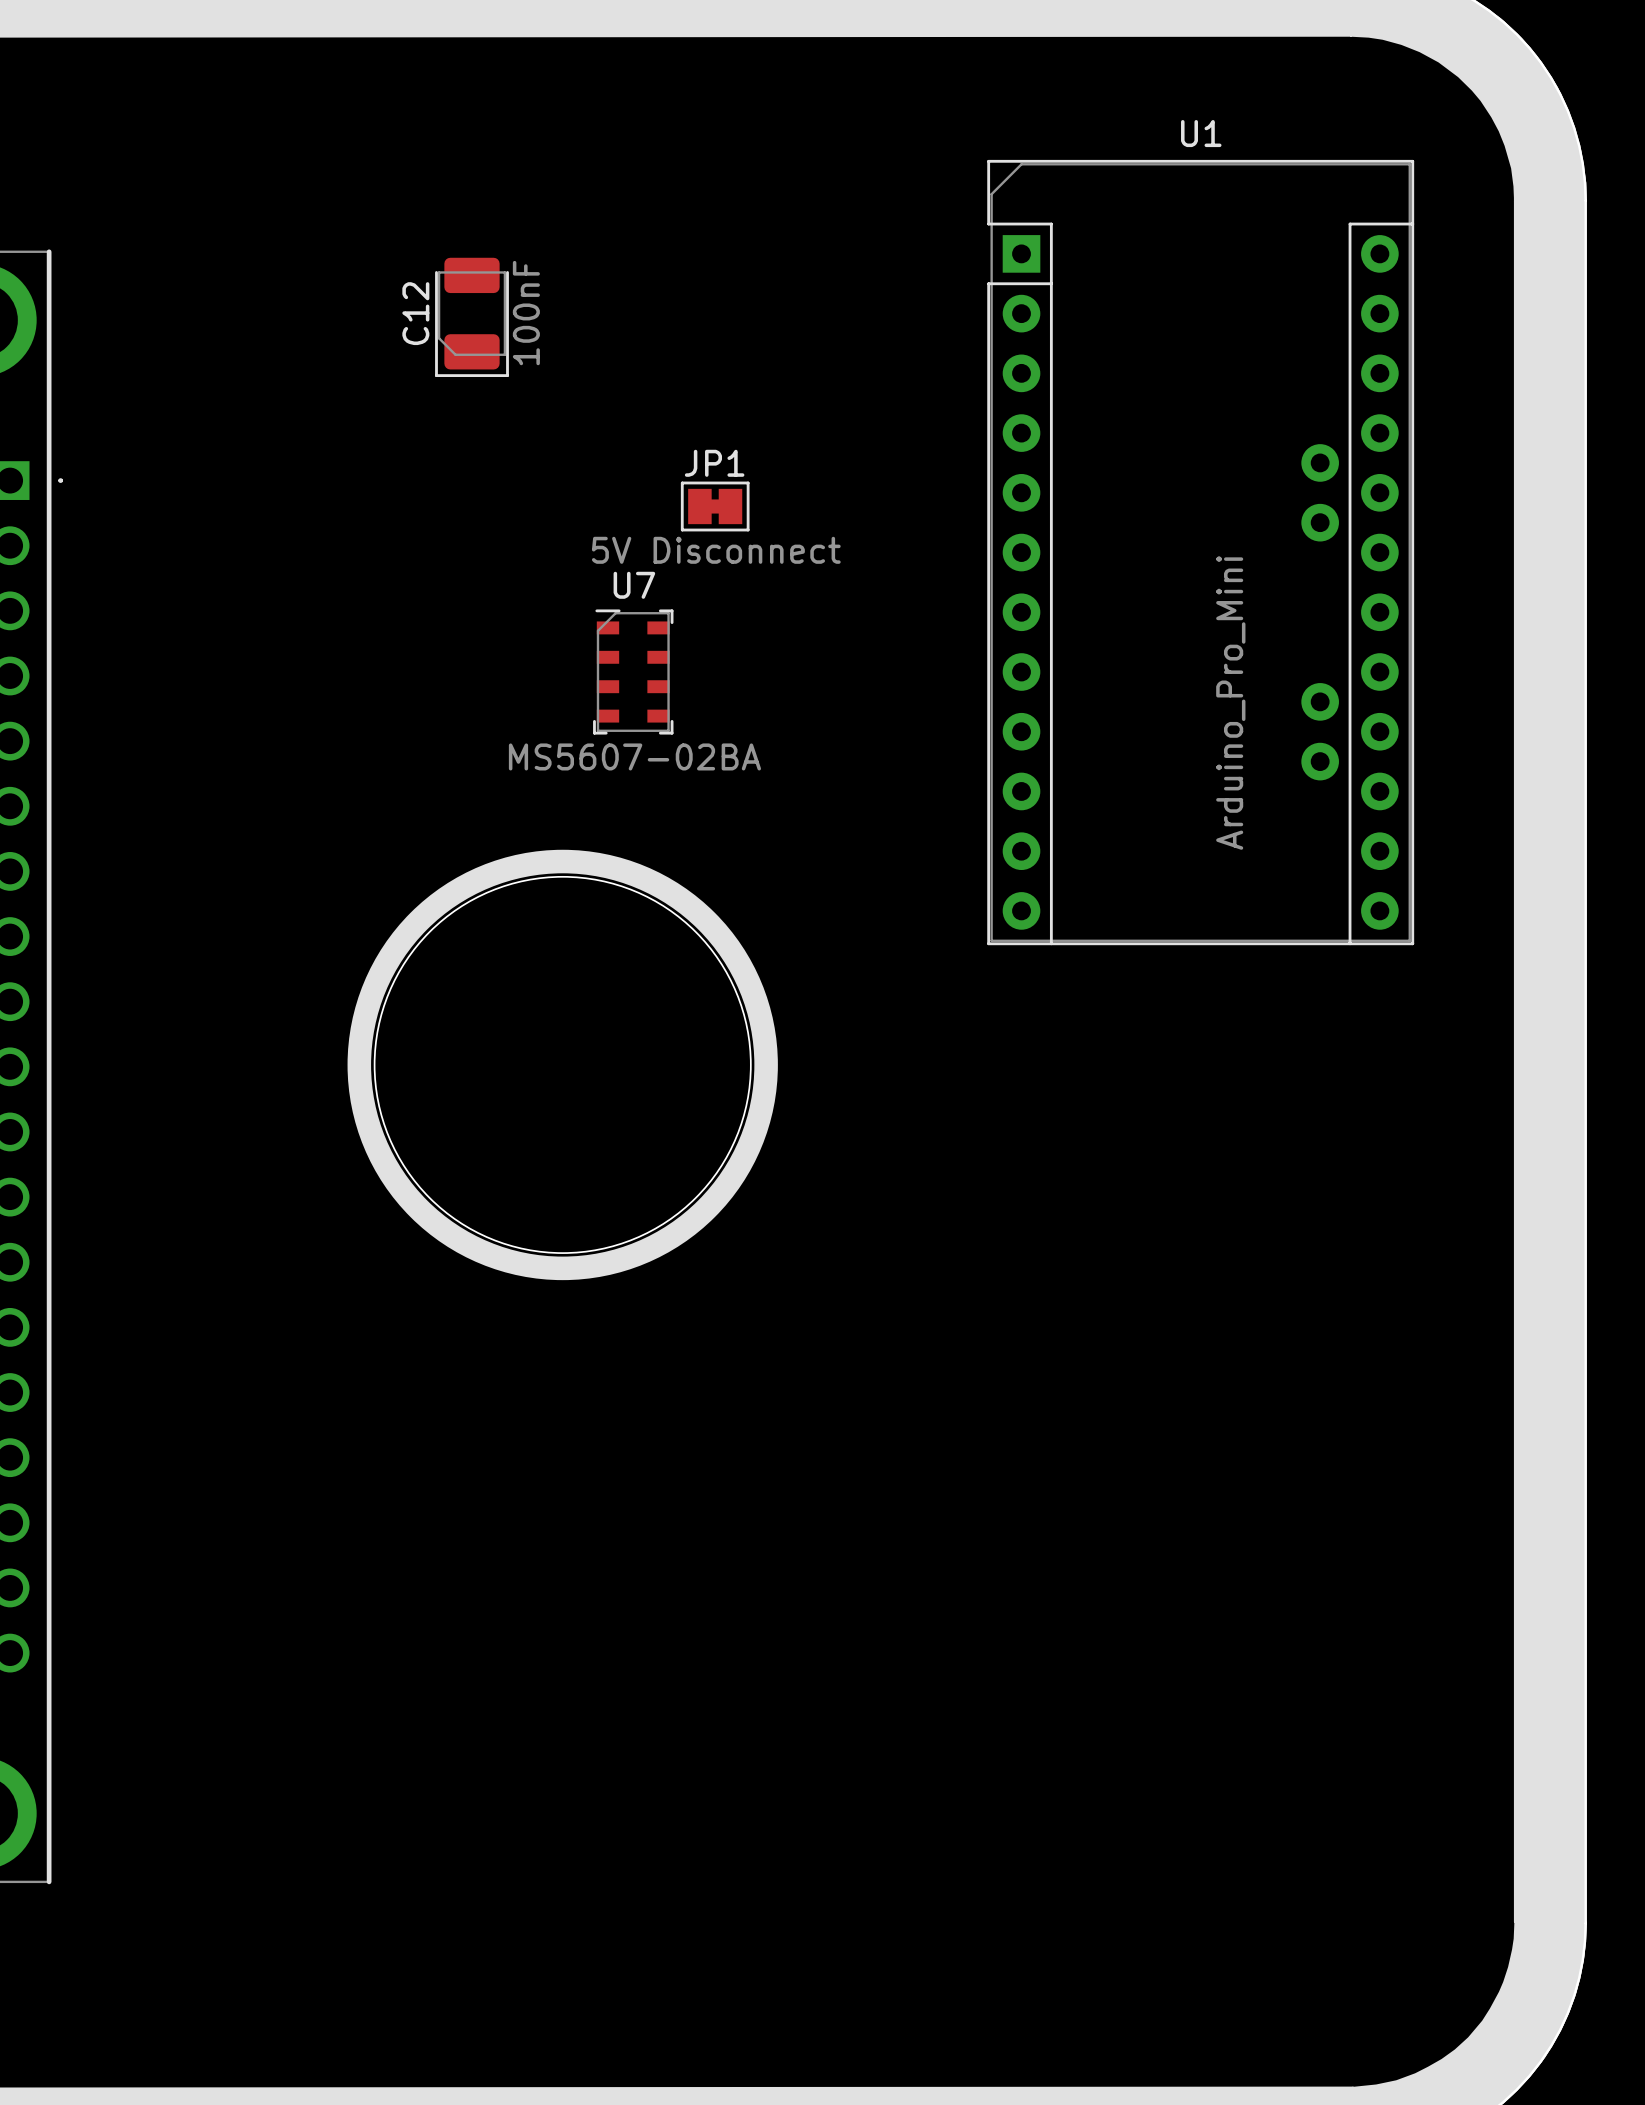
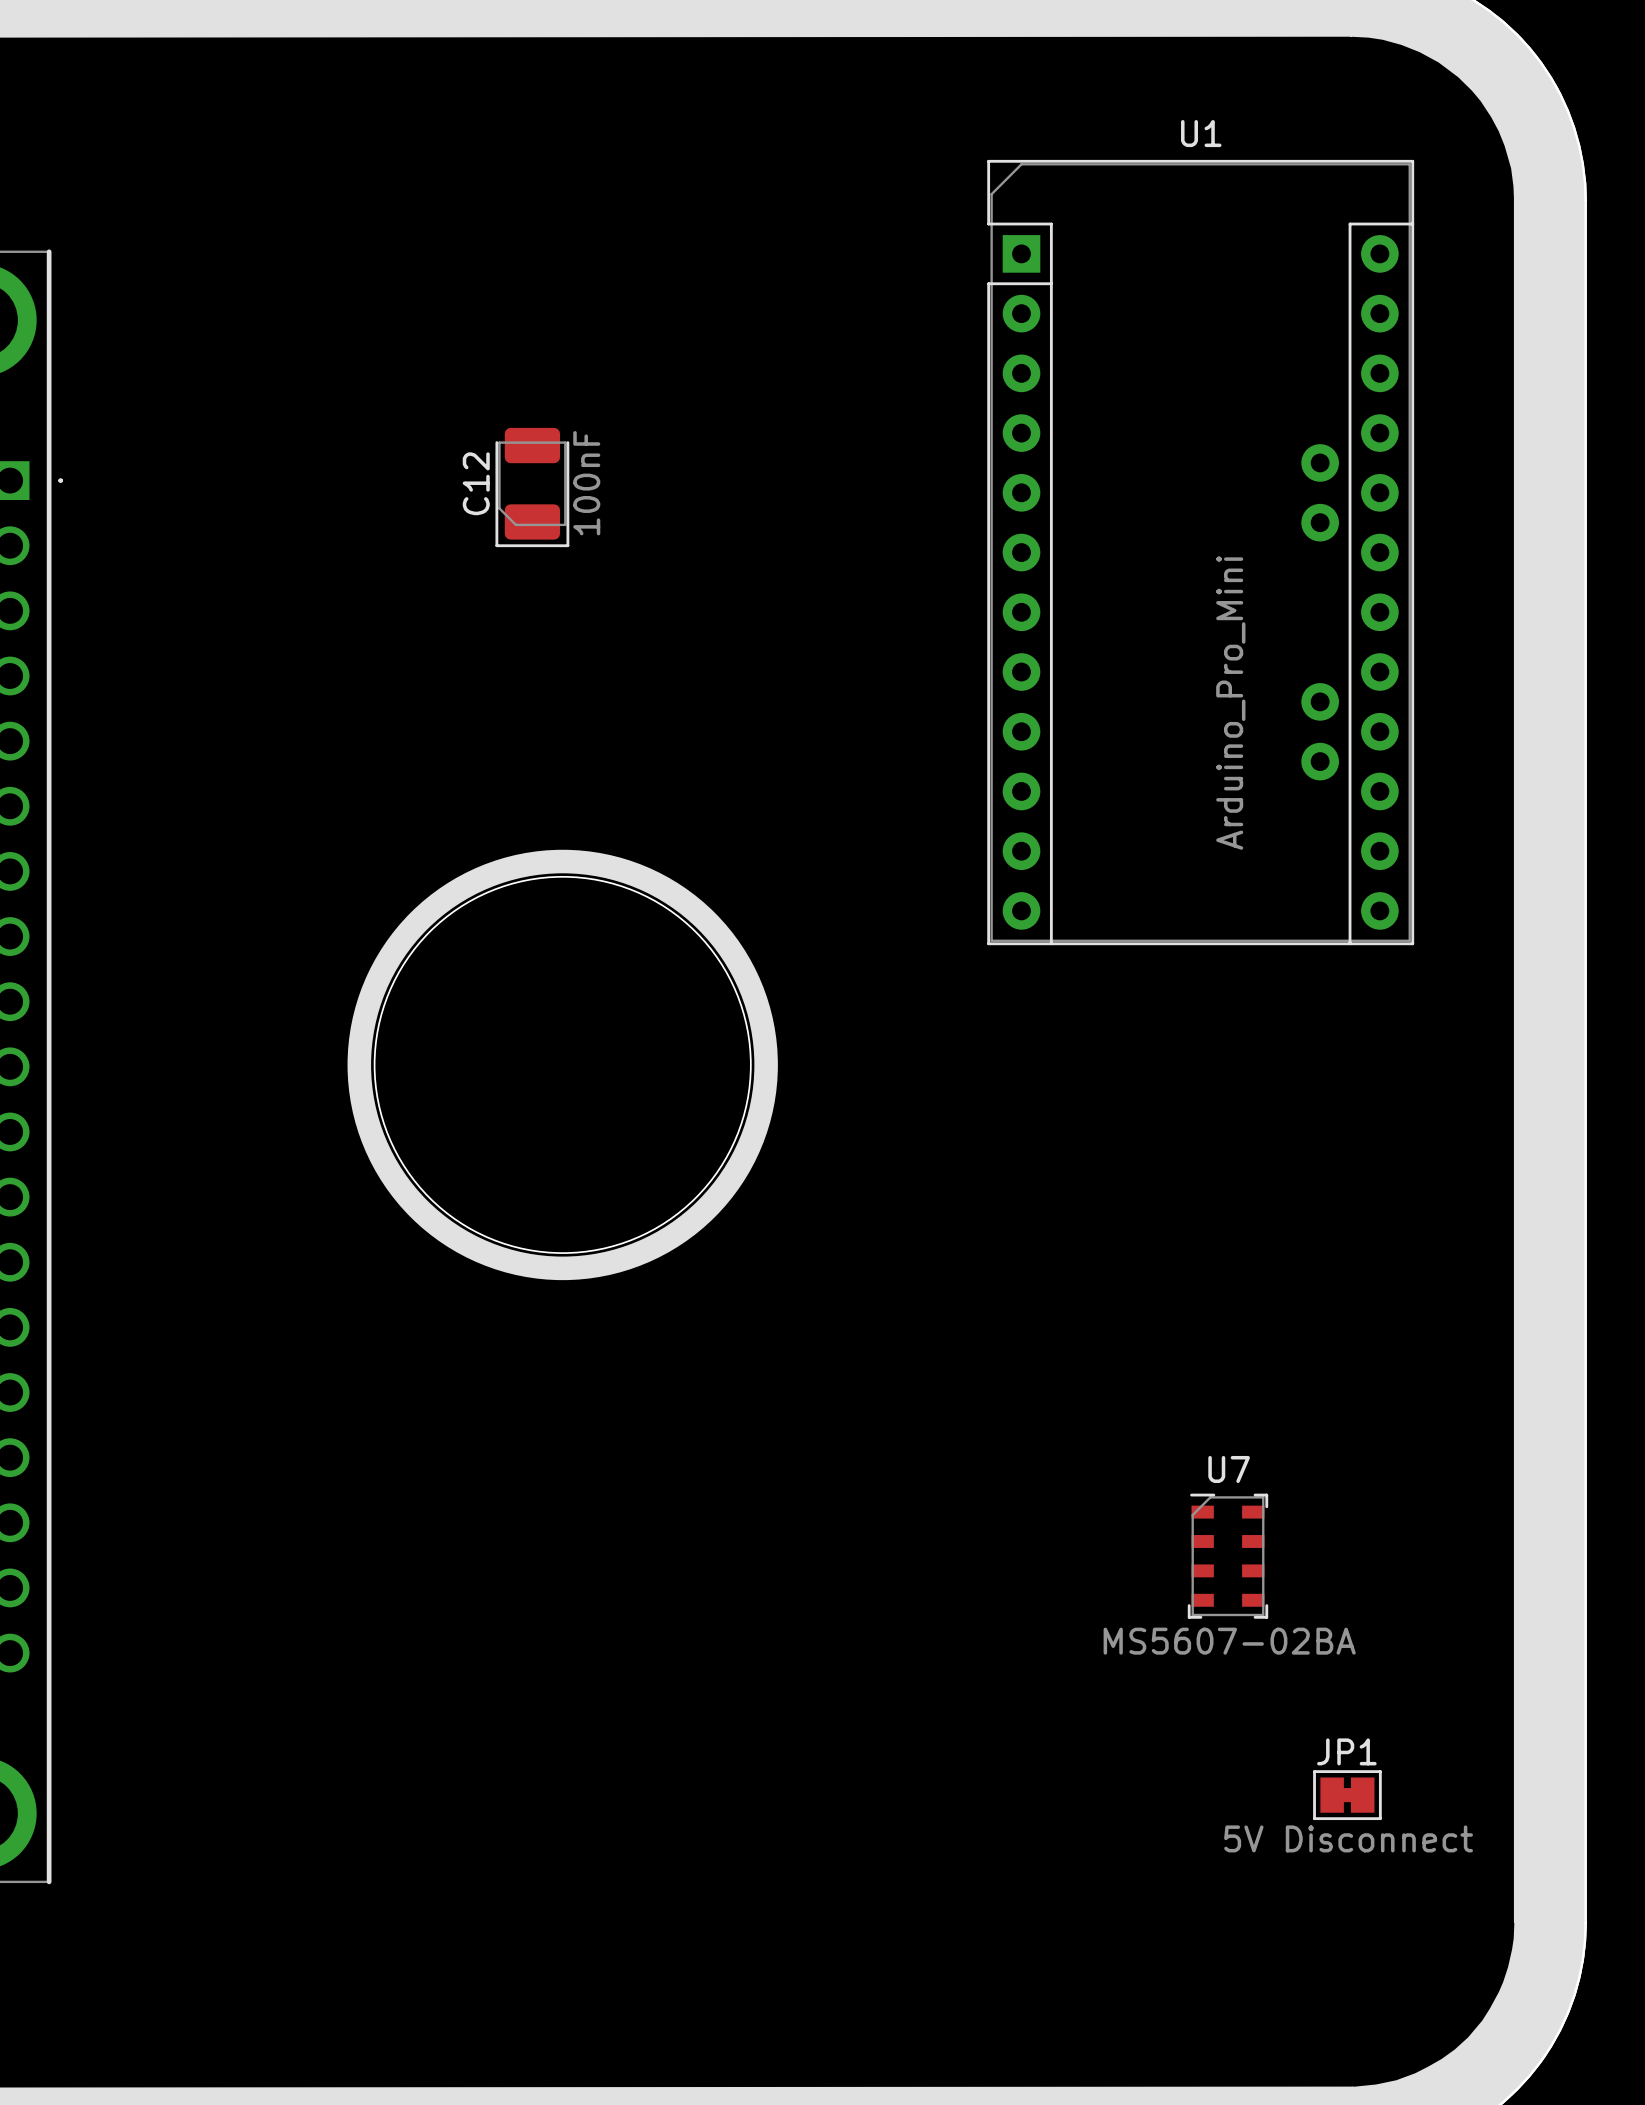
C12 position: (471, 317) -> (532, 487)
JP1 position: (715, 506) -> (1347, 1795)
U7 position: (633, 672) -> (1227, 1556)

